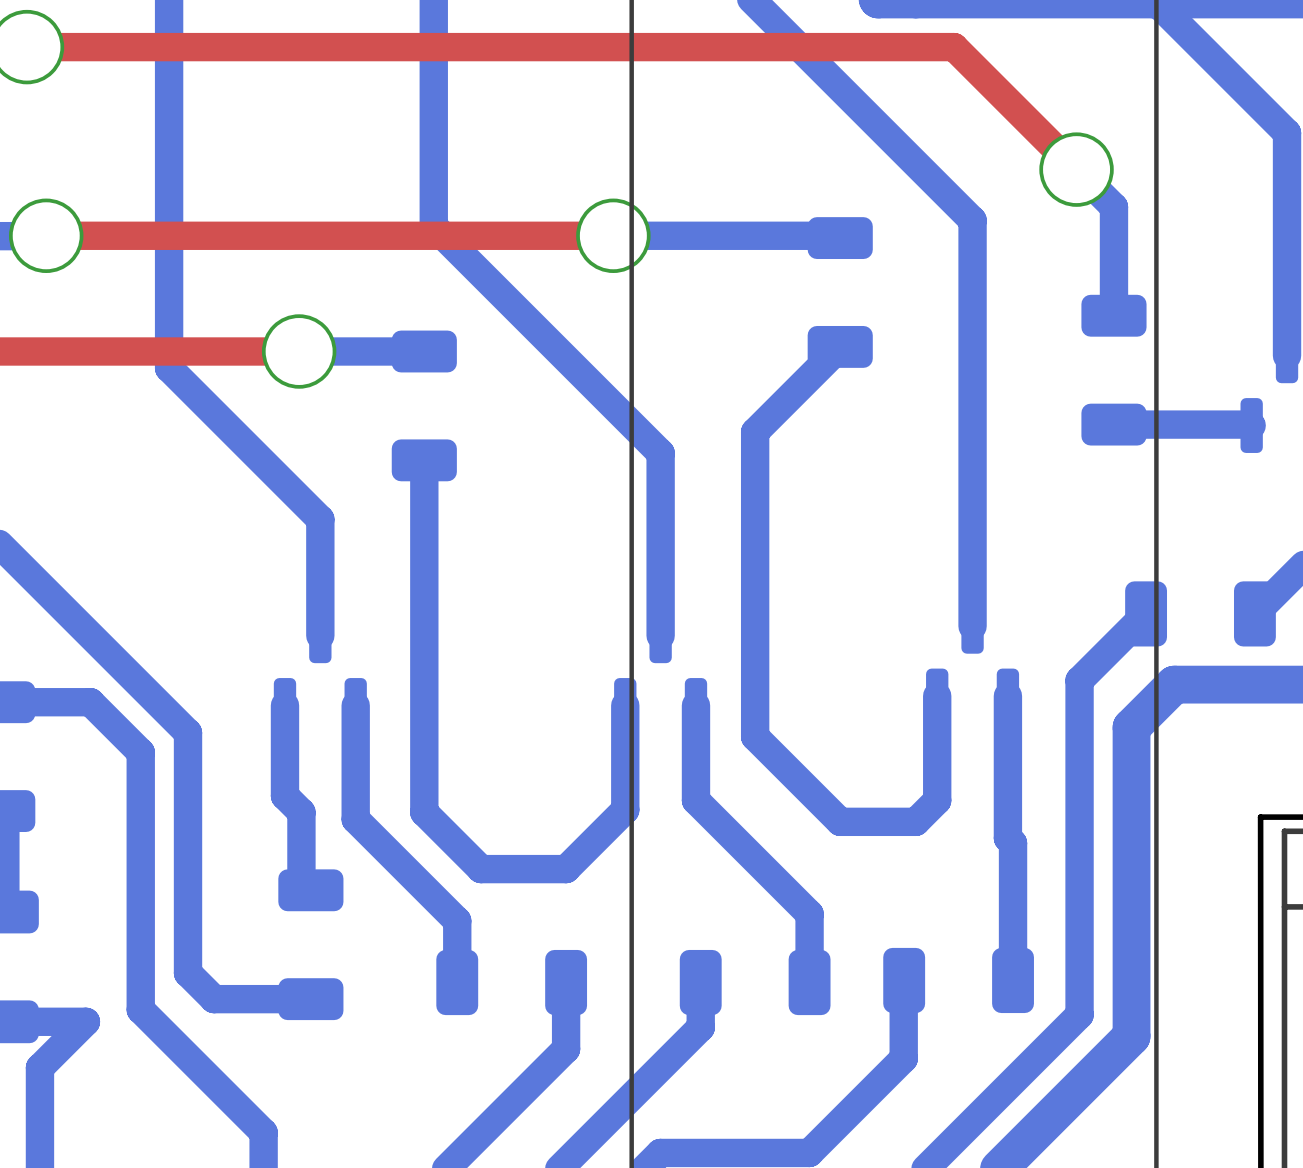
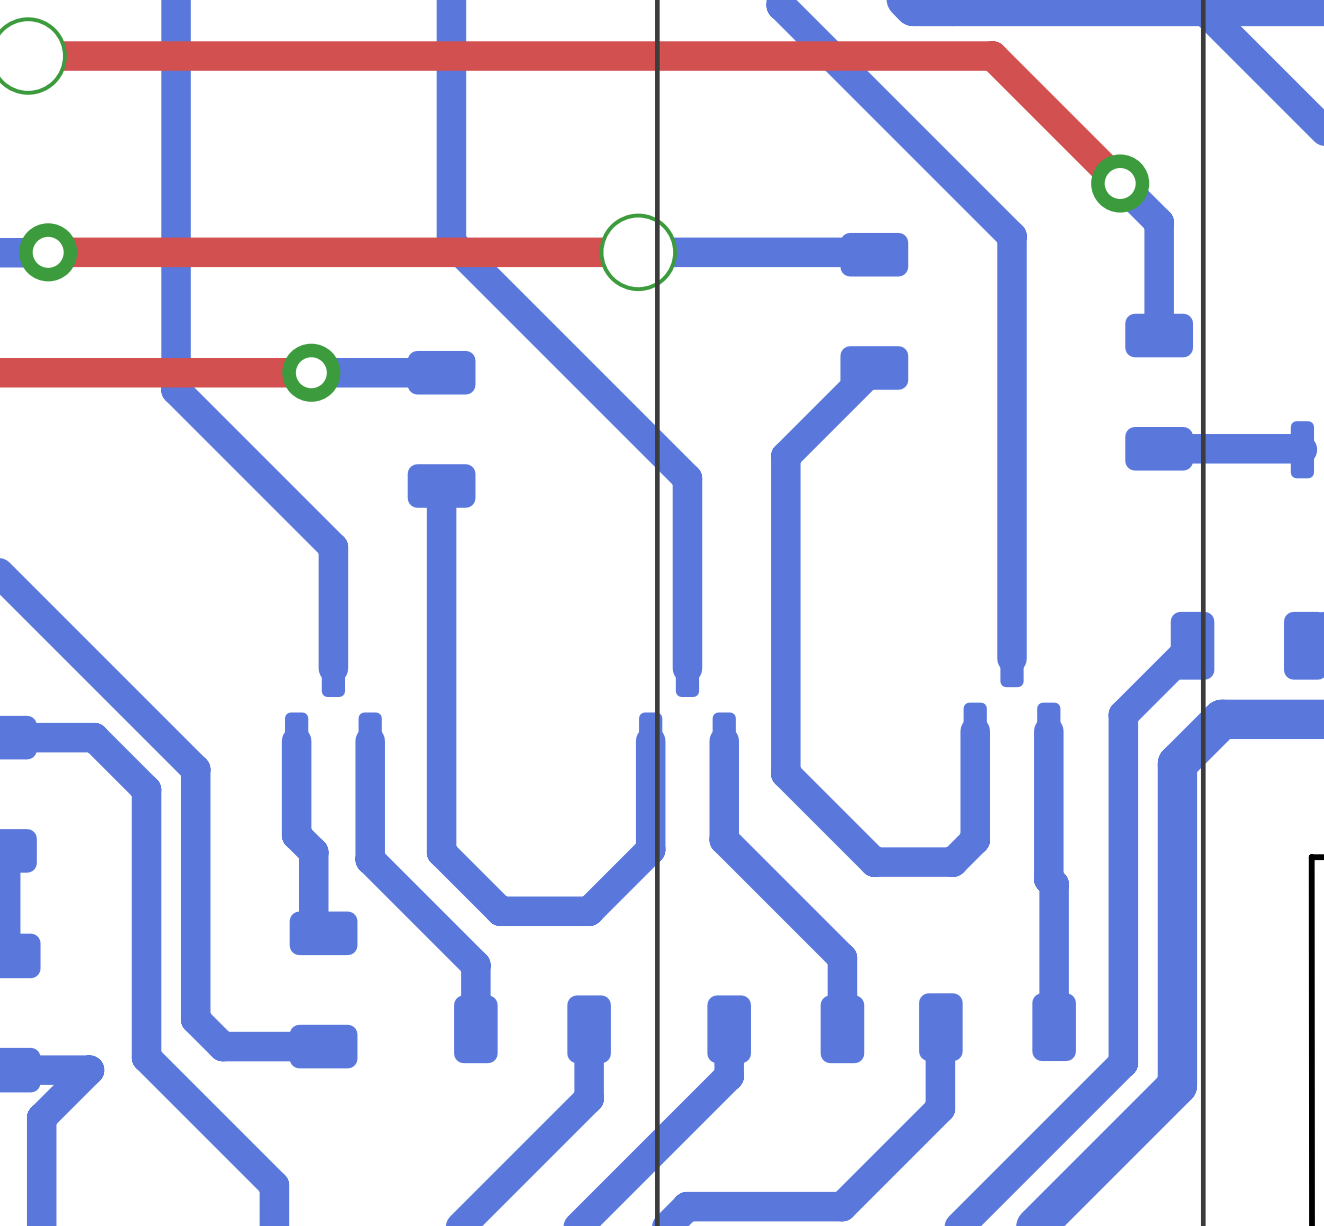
via size: [1039, 132, 1114, 207] -> [1091, 154, 1150, 213]
via size: [9, 198, 84, 274] -> [19, 223, 78, 282]
via size: [261, 314, 337, 389] -> [282, 343, 341, 402]

